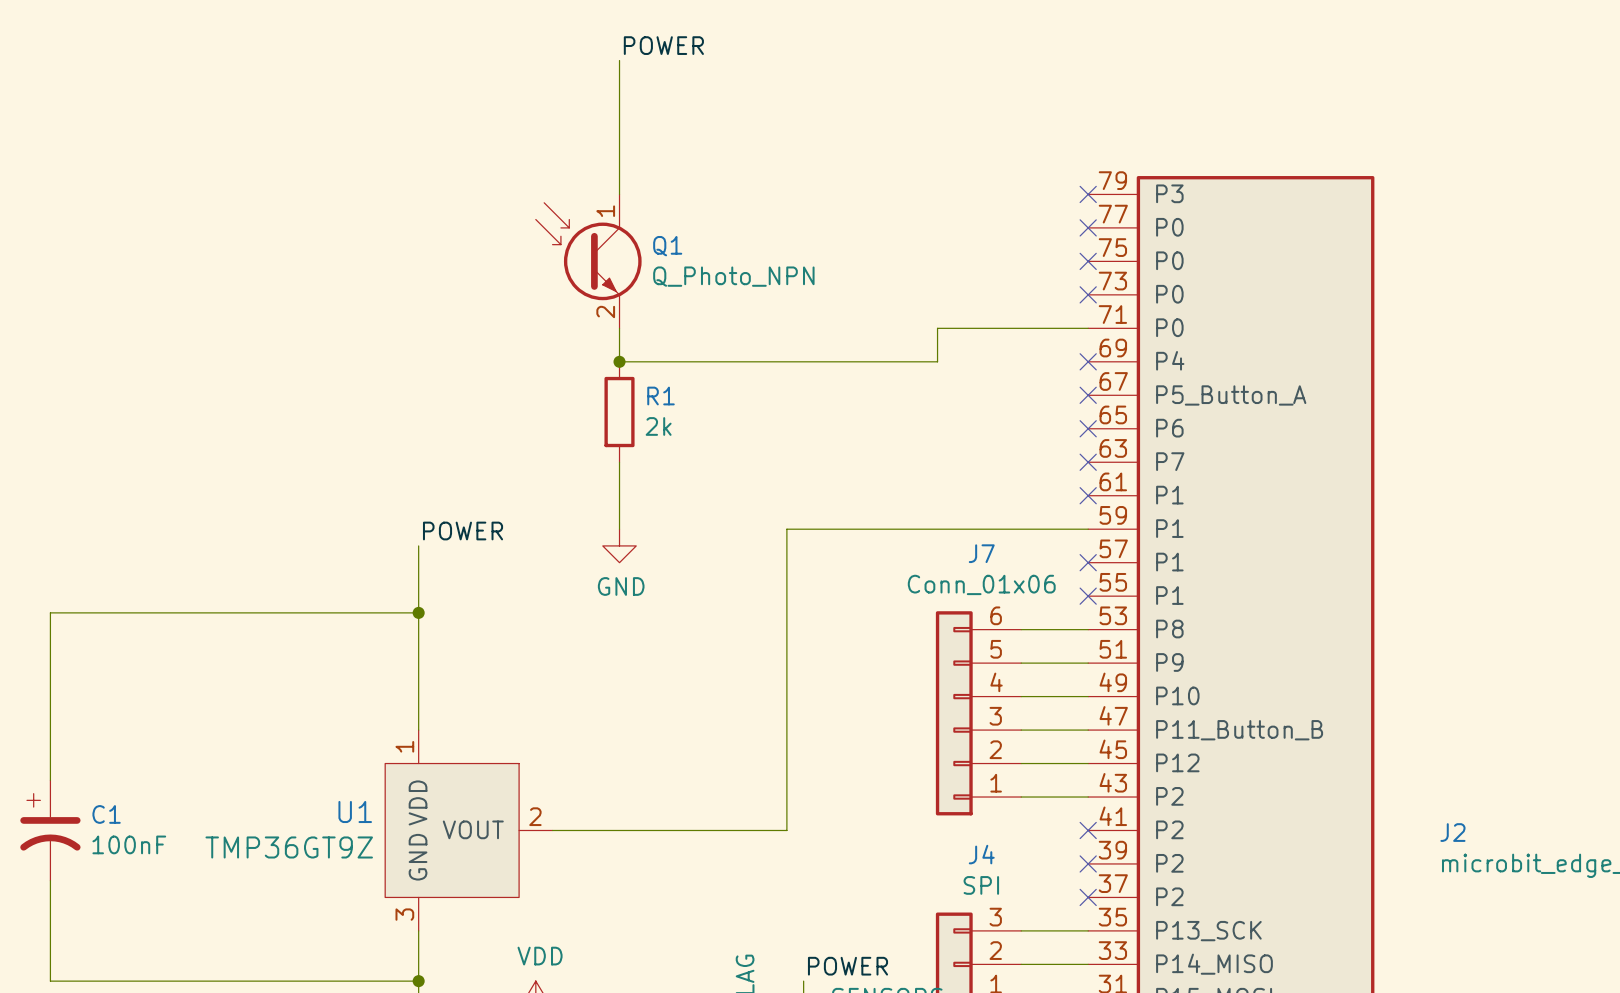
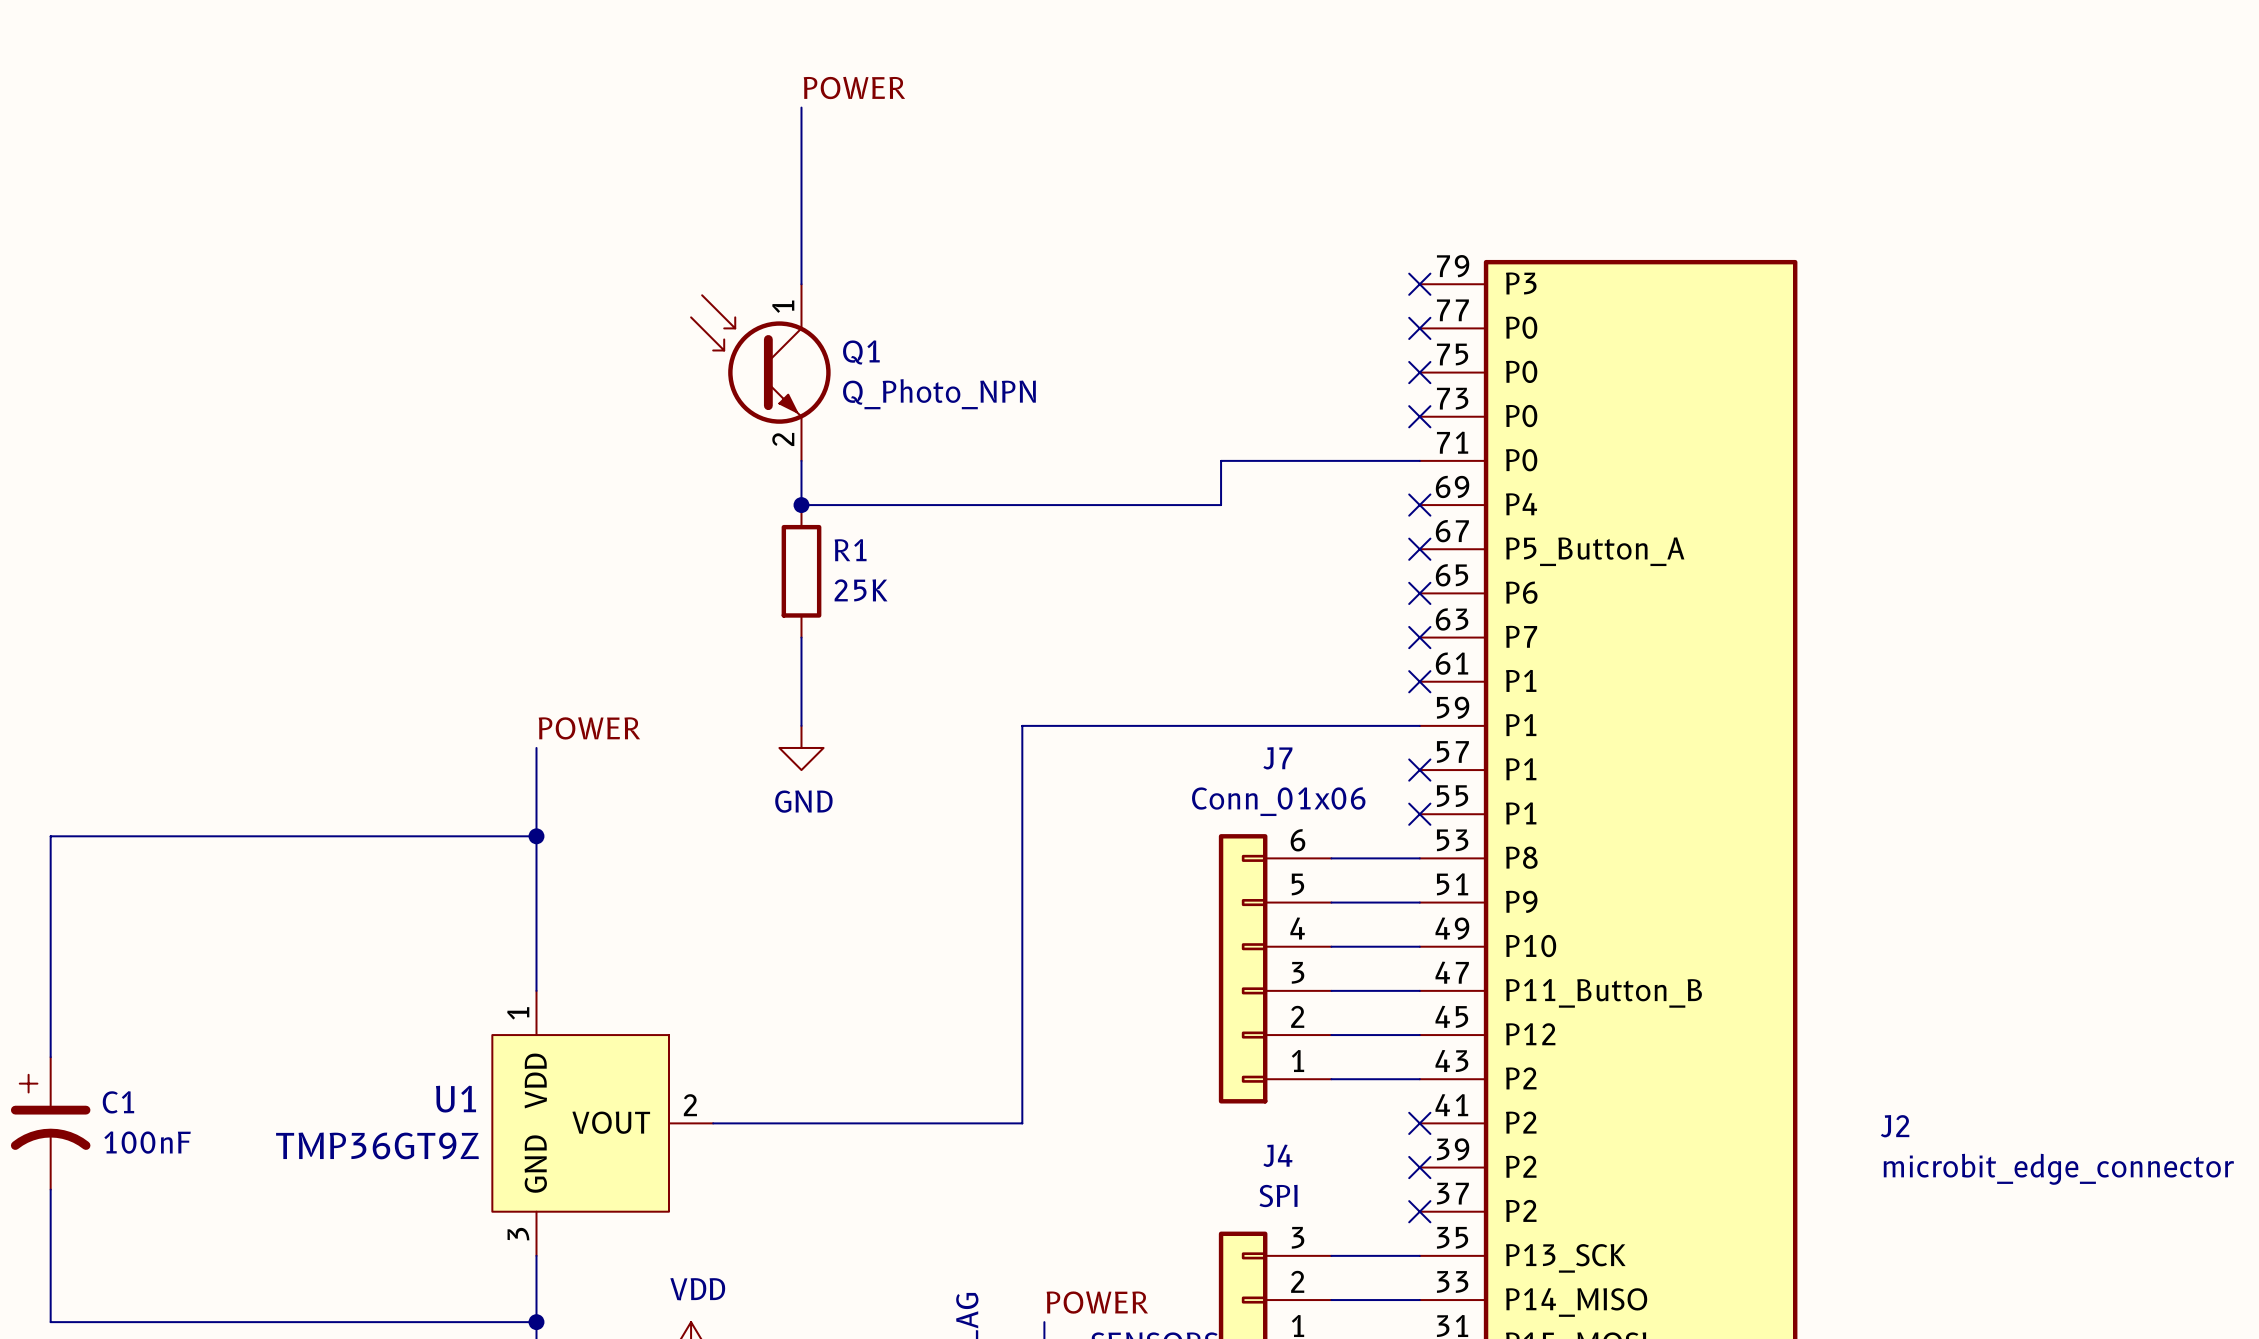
R1 value: 2k (658, 426) -> 25K (861, 590)

